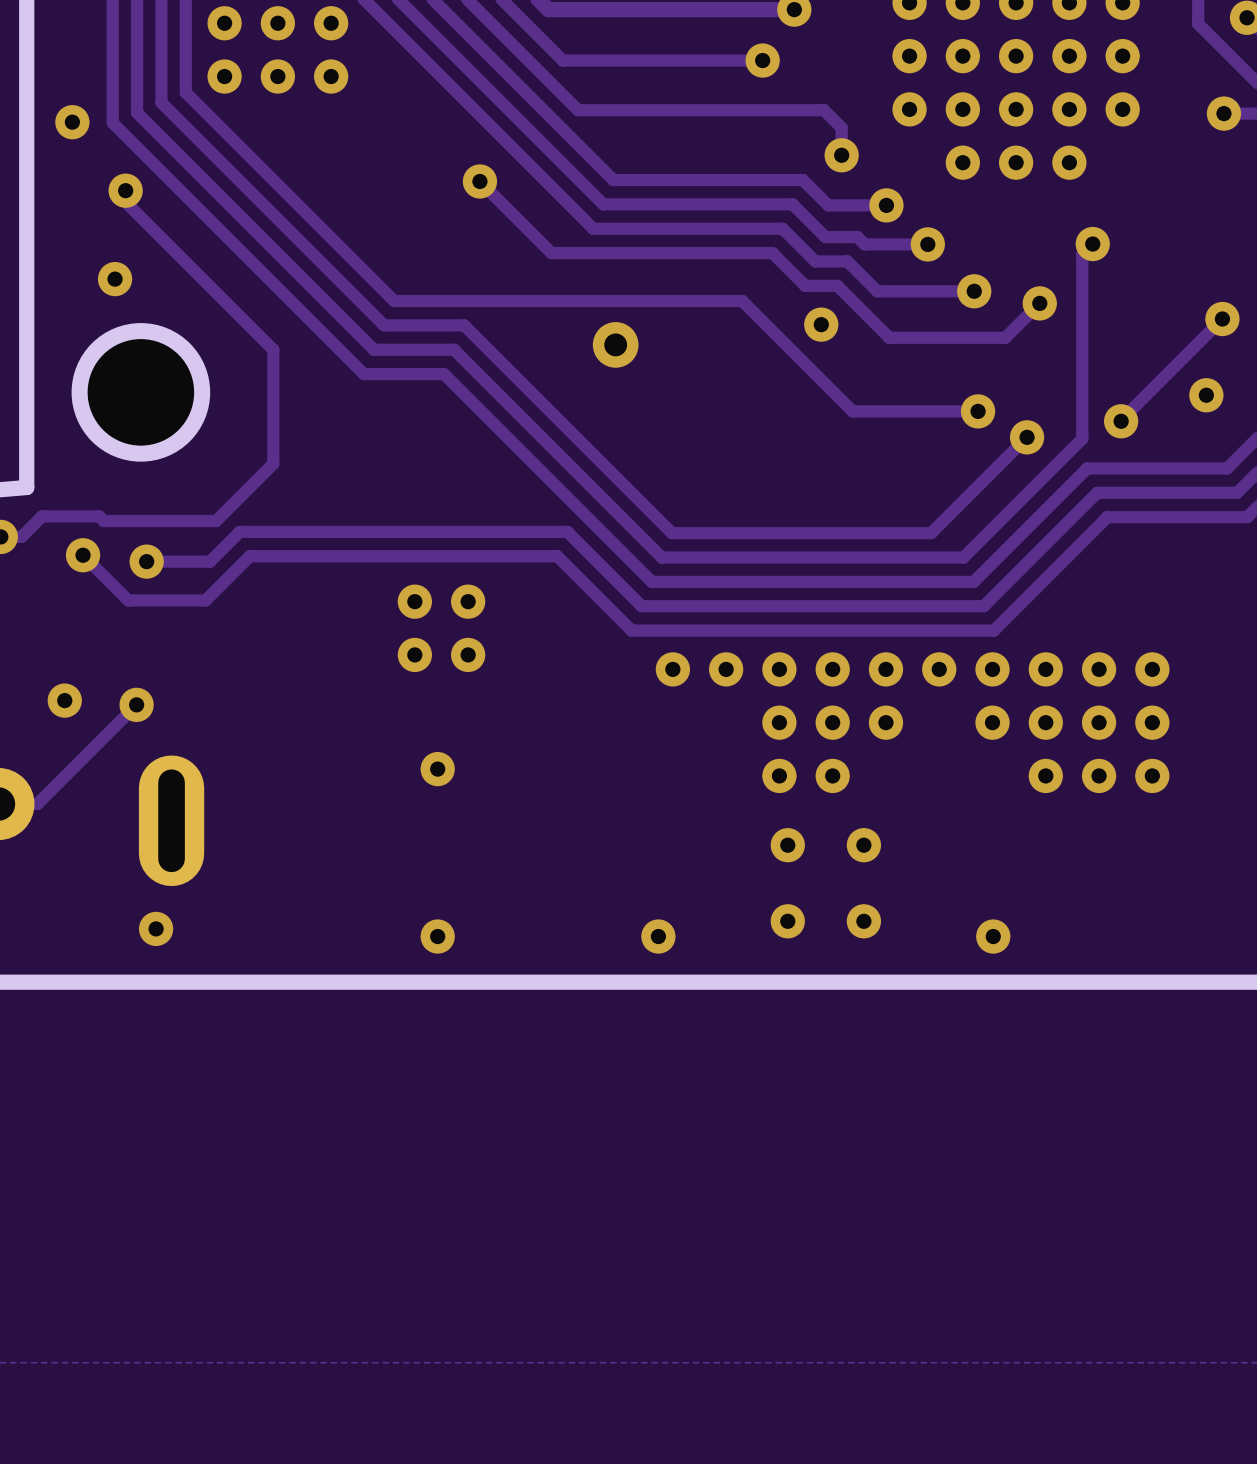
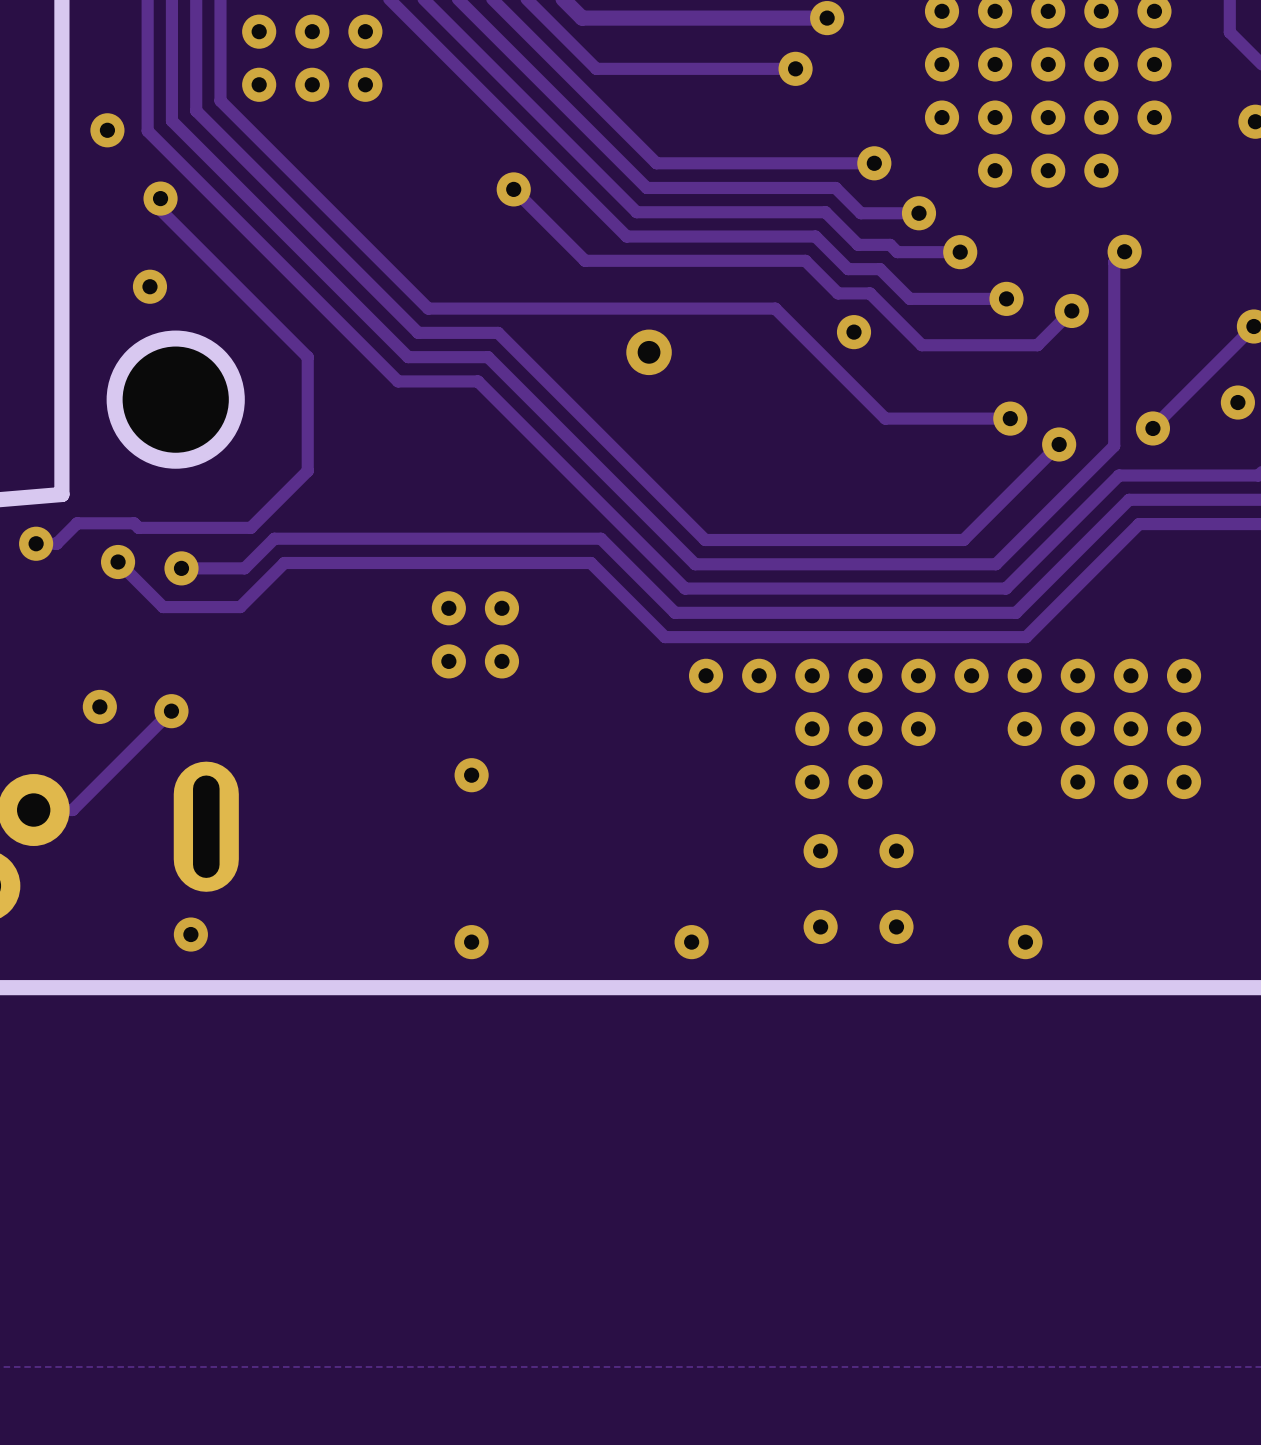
track: (578, 110) (824, 110) (841, 127) (841, 155) -> (611, 118) (656, 163) (874, 163)

